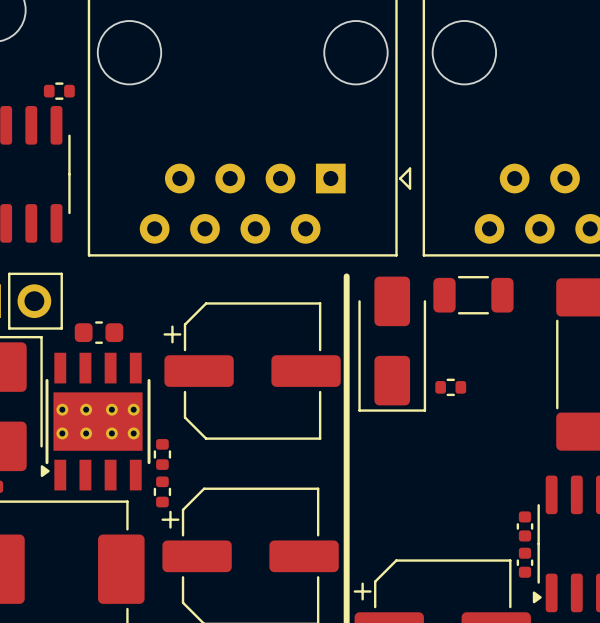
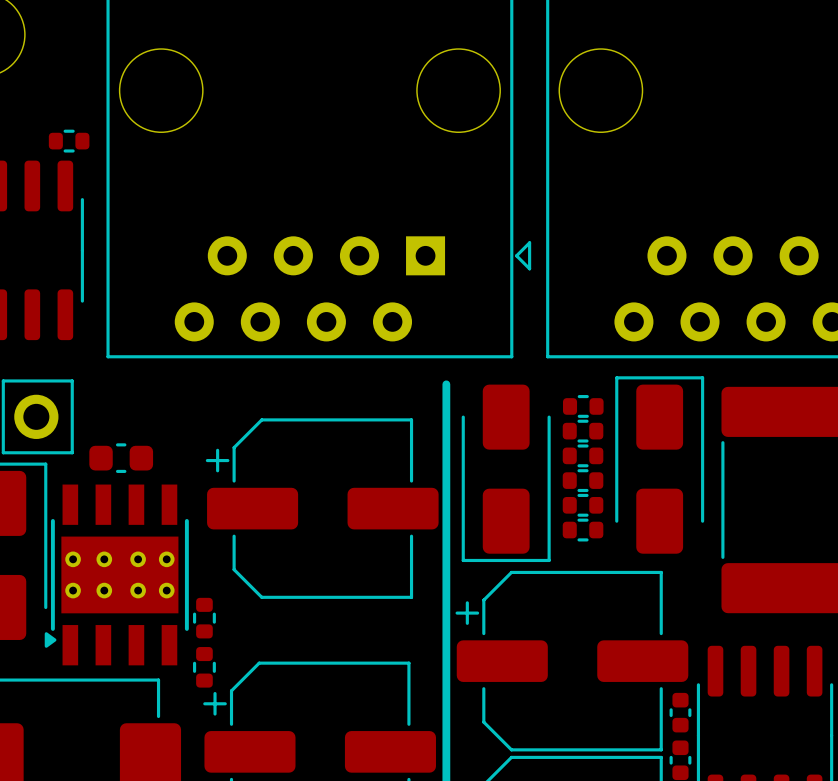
part: none -> (583, 406)
part: (473, 295) -> none
part: none -> (583, 431)
part: none -> (583, 455)
part: none -> (659, 464)
part: none -> (583, 480)
part: none -> (583, 505)
part: none -> (571, 661)

